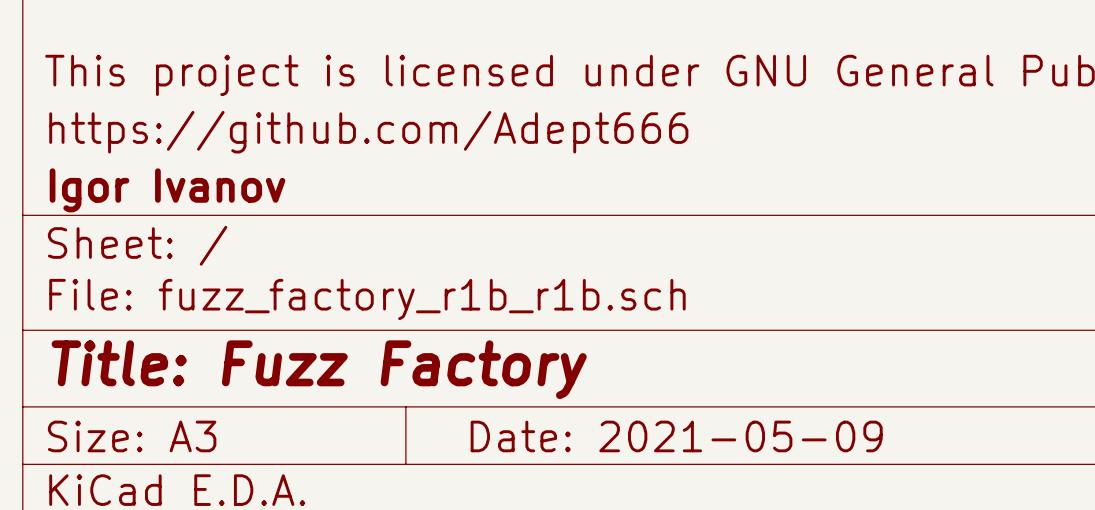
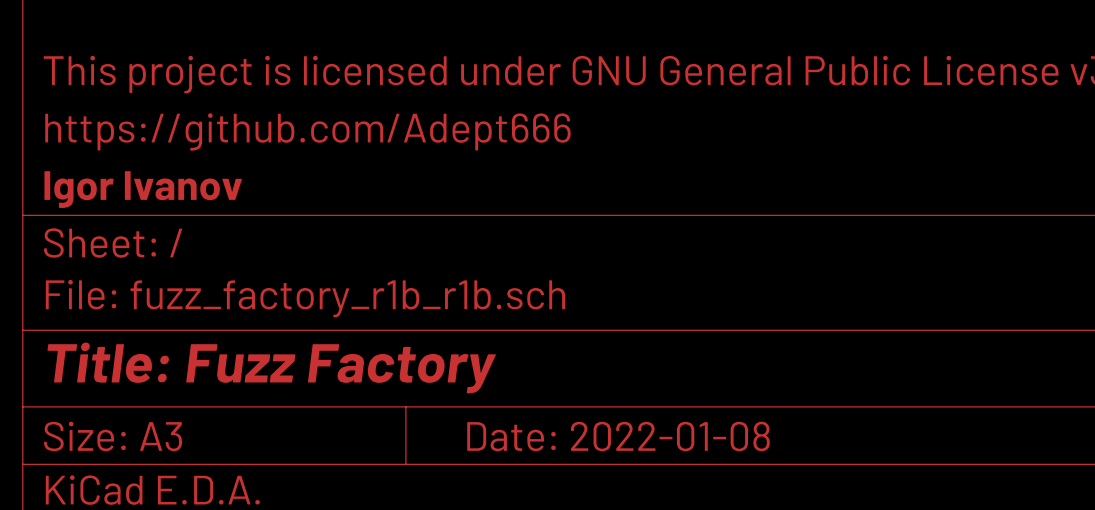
title block: Date: 2021-05-09 (676, 436) -> Date: 2022-01-08 (618, 436)

